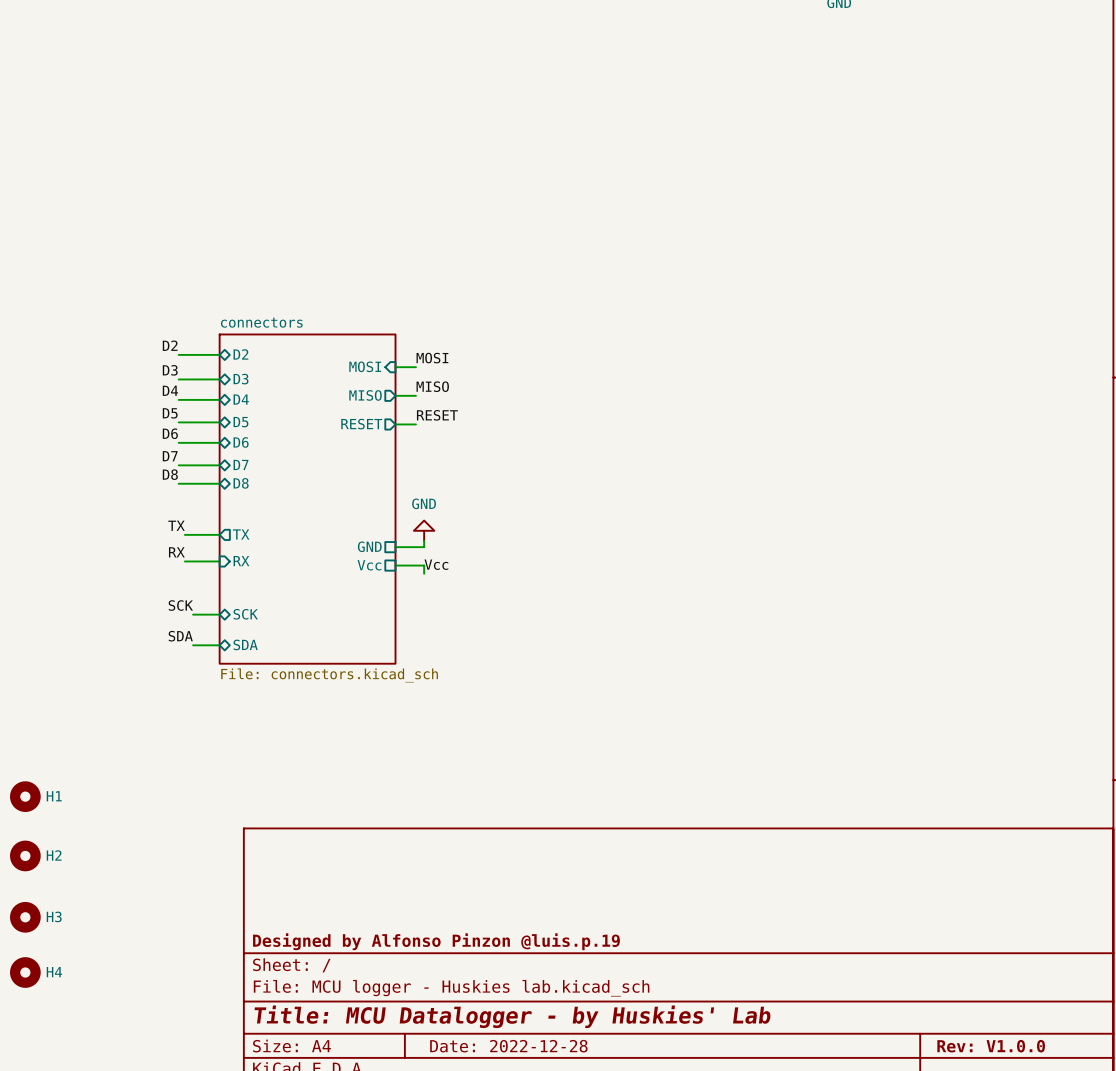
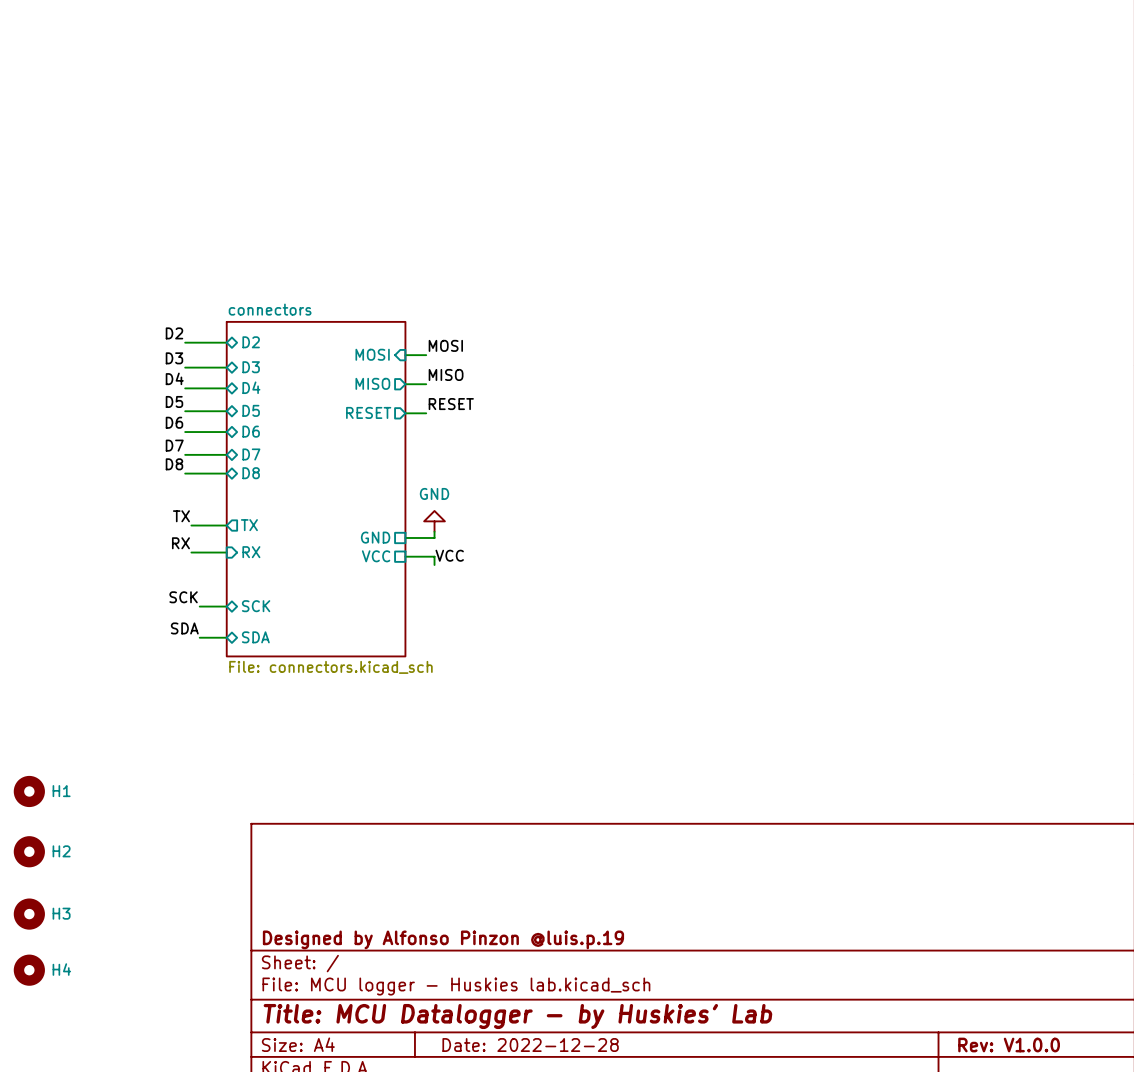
label: Vcc (436, 564) -> VCC (449, 555)
sheet pin: Vcc (369, 565) -> VCC (376, 556)

